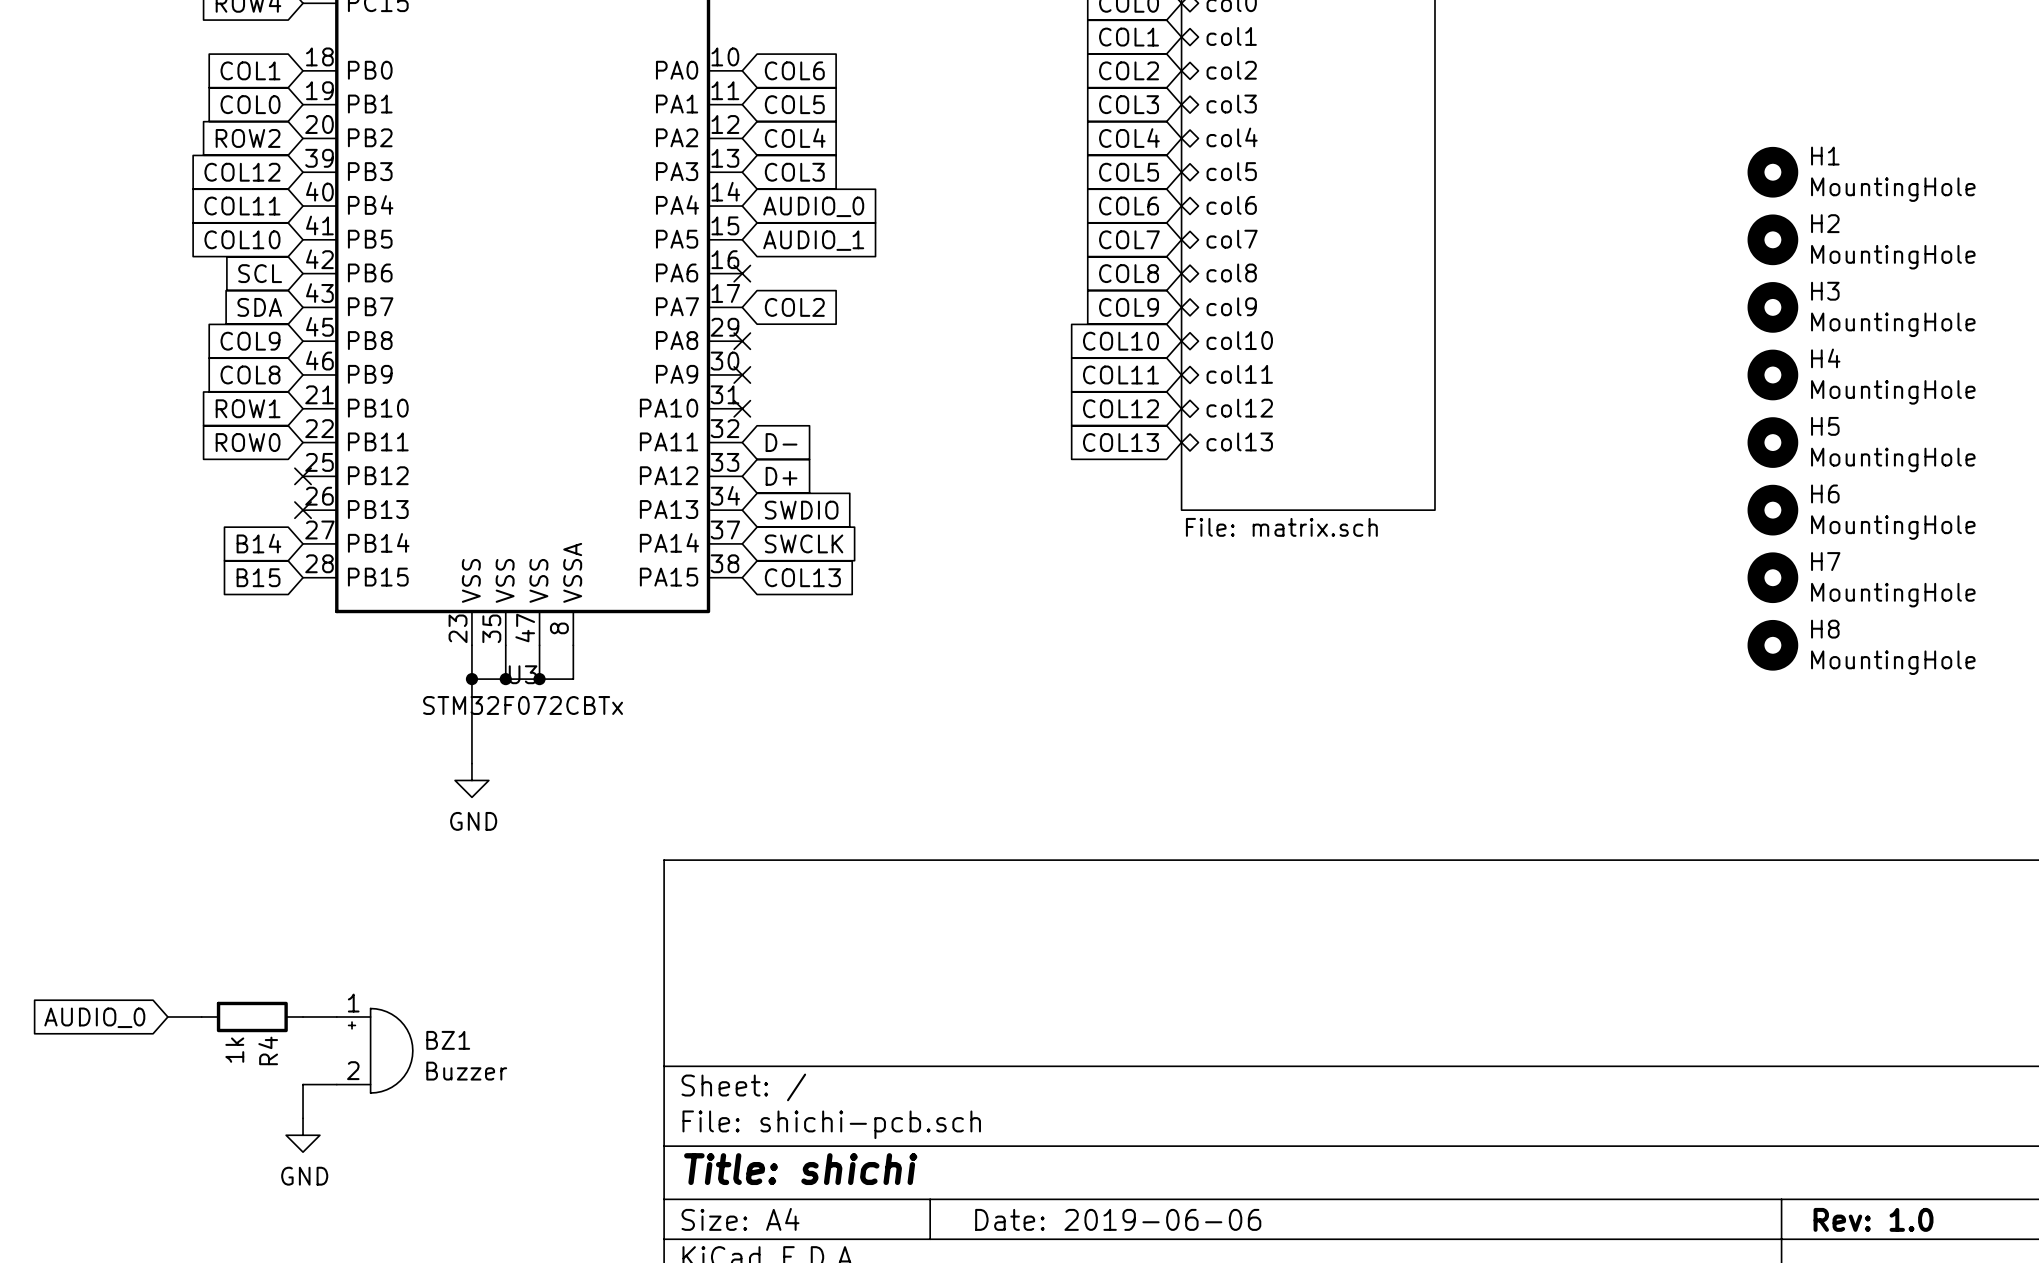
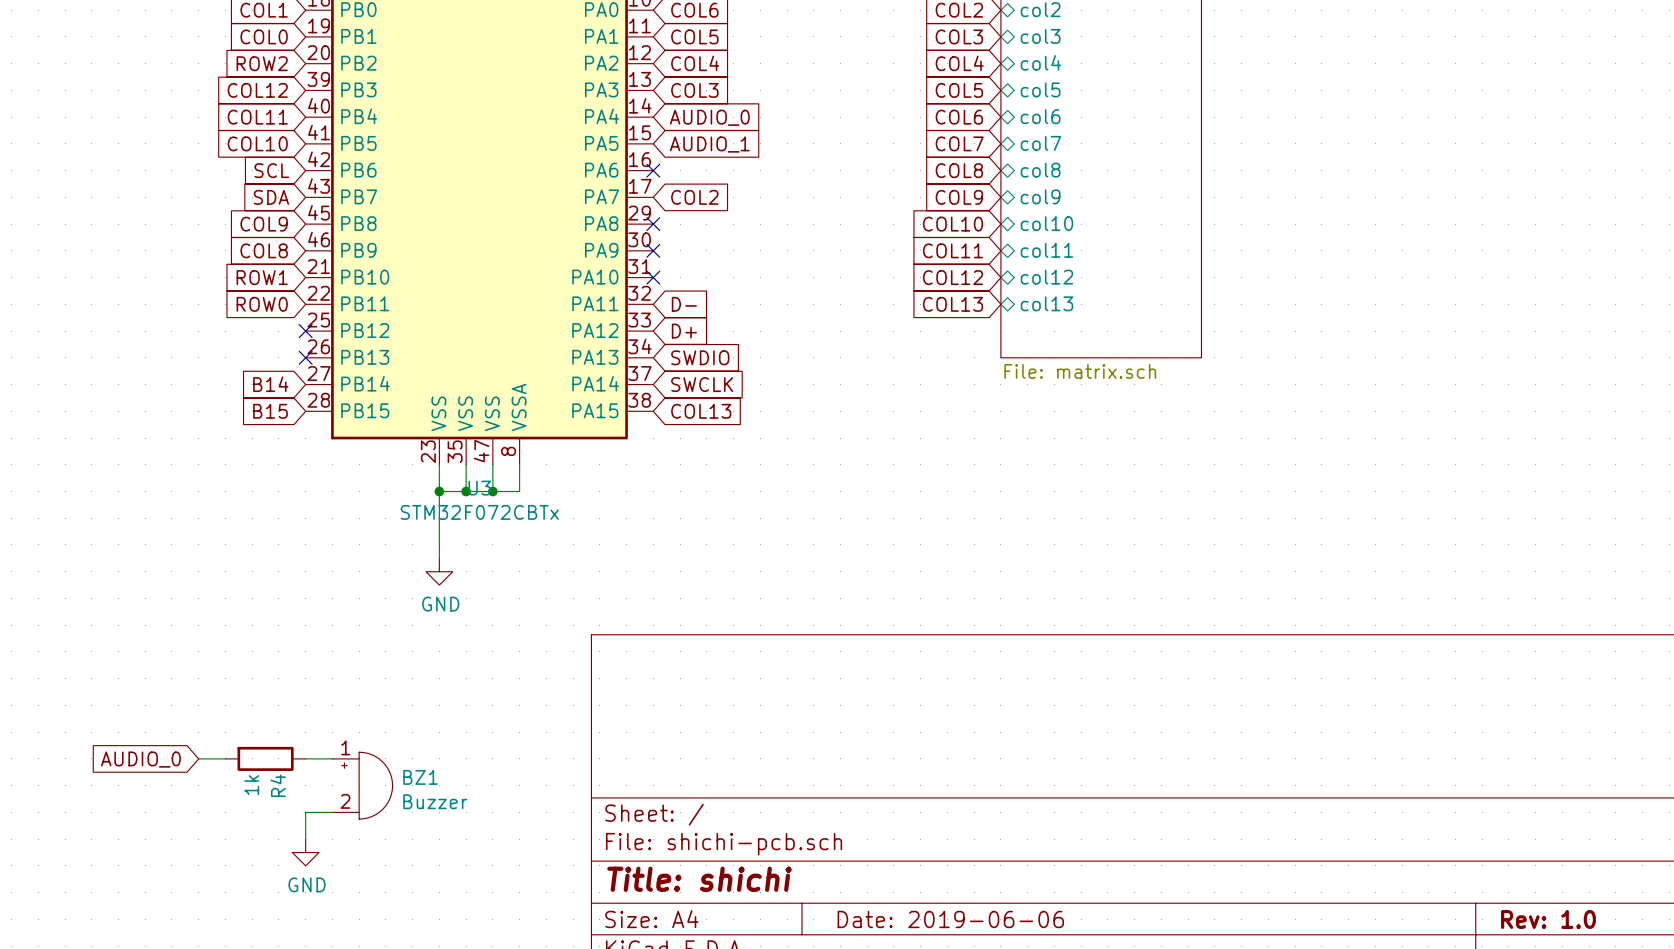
H1: MountingHole (1772, 172) -> none
H2: MountingHole (1772, 239) -> none
H3: MountingHole (1772, 307) -> none
H4: MountingHole (1772, 374) -> none
H5: MountingHole (1772, 442) -> none
H6: MountingHole (1772, 510) -> none
H7: MountingHole (1772, 577) -> none
H8: MountingHole (1772, 645) -> none

